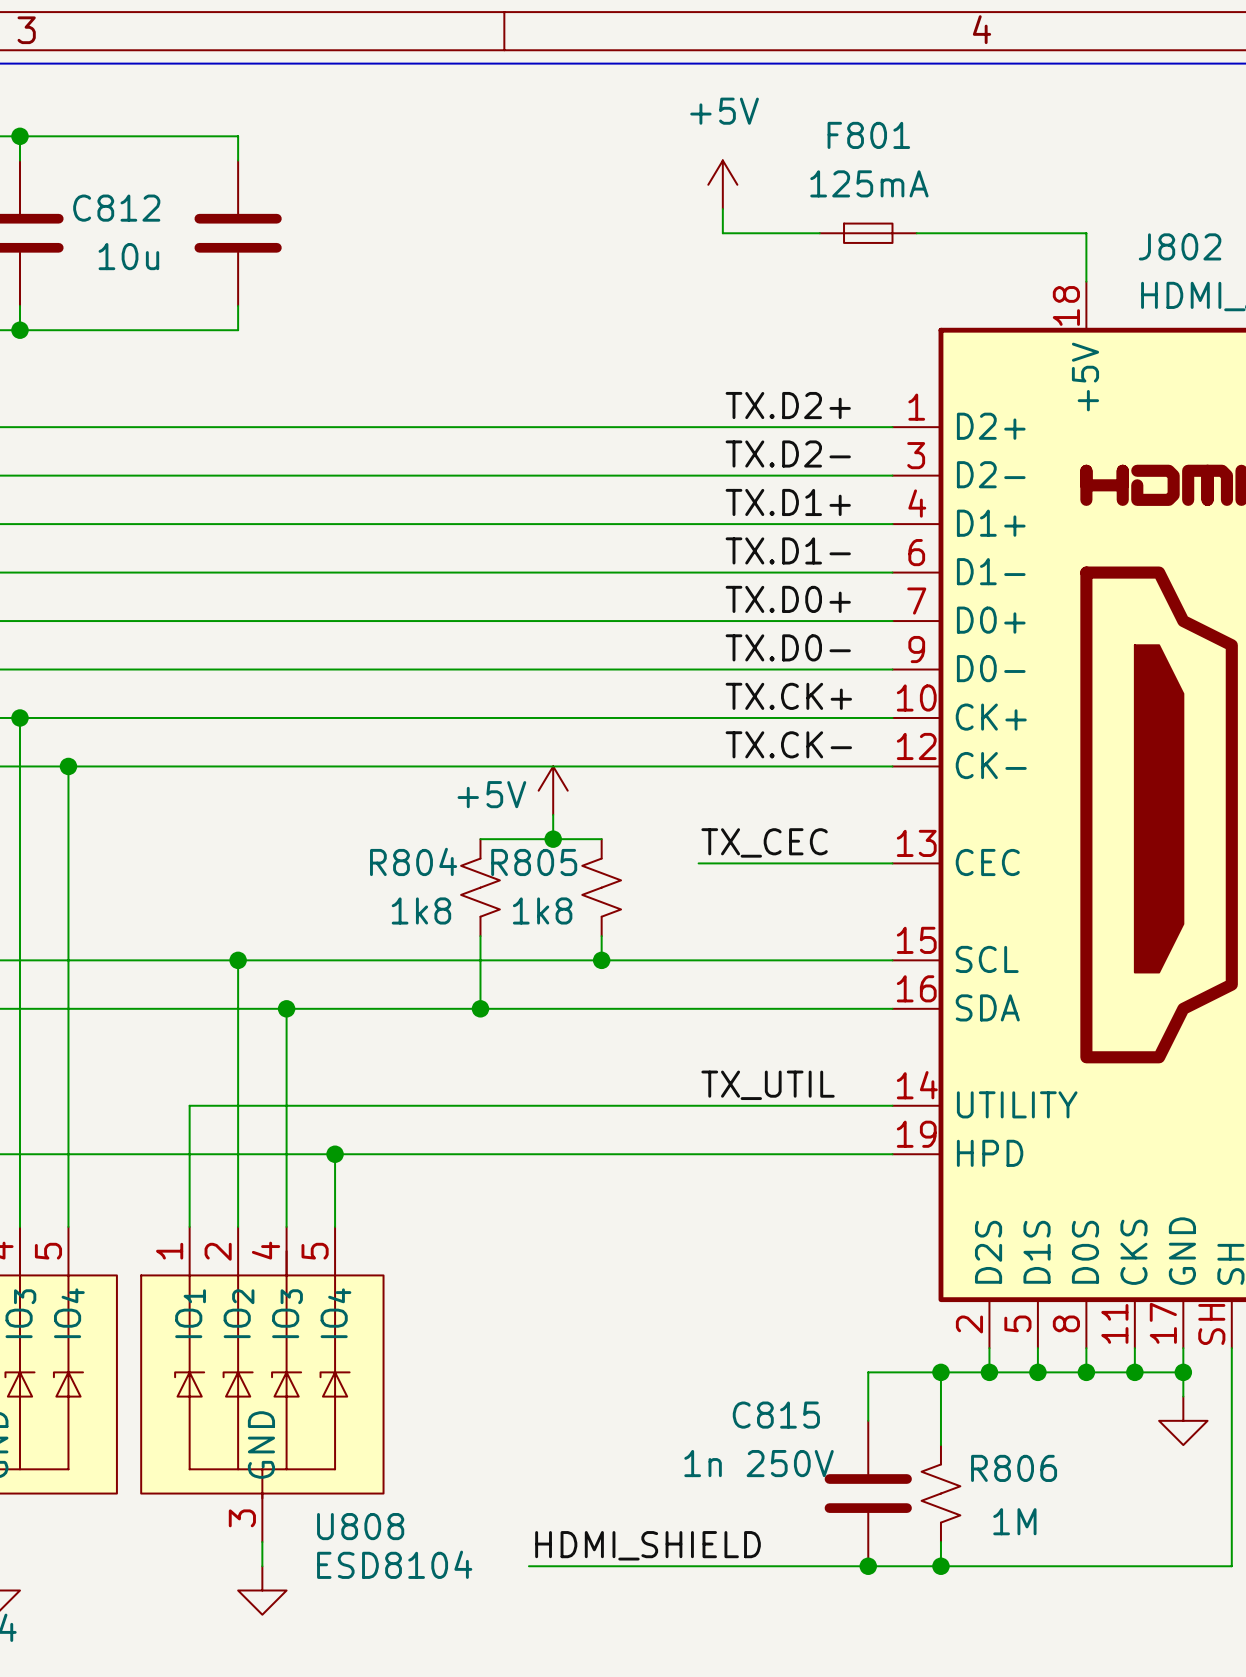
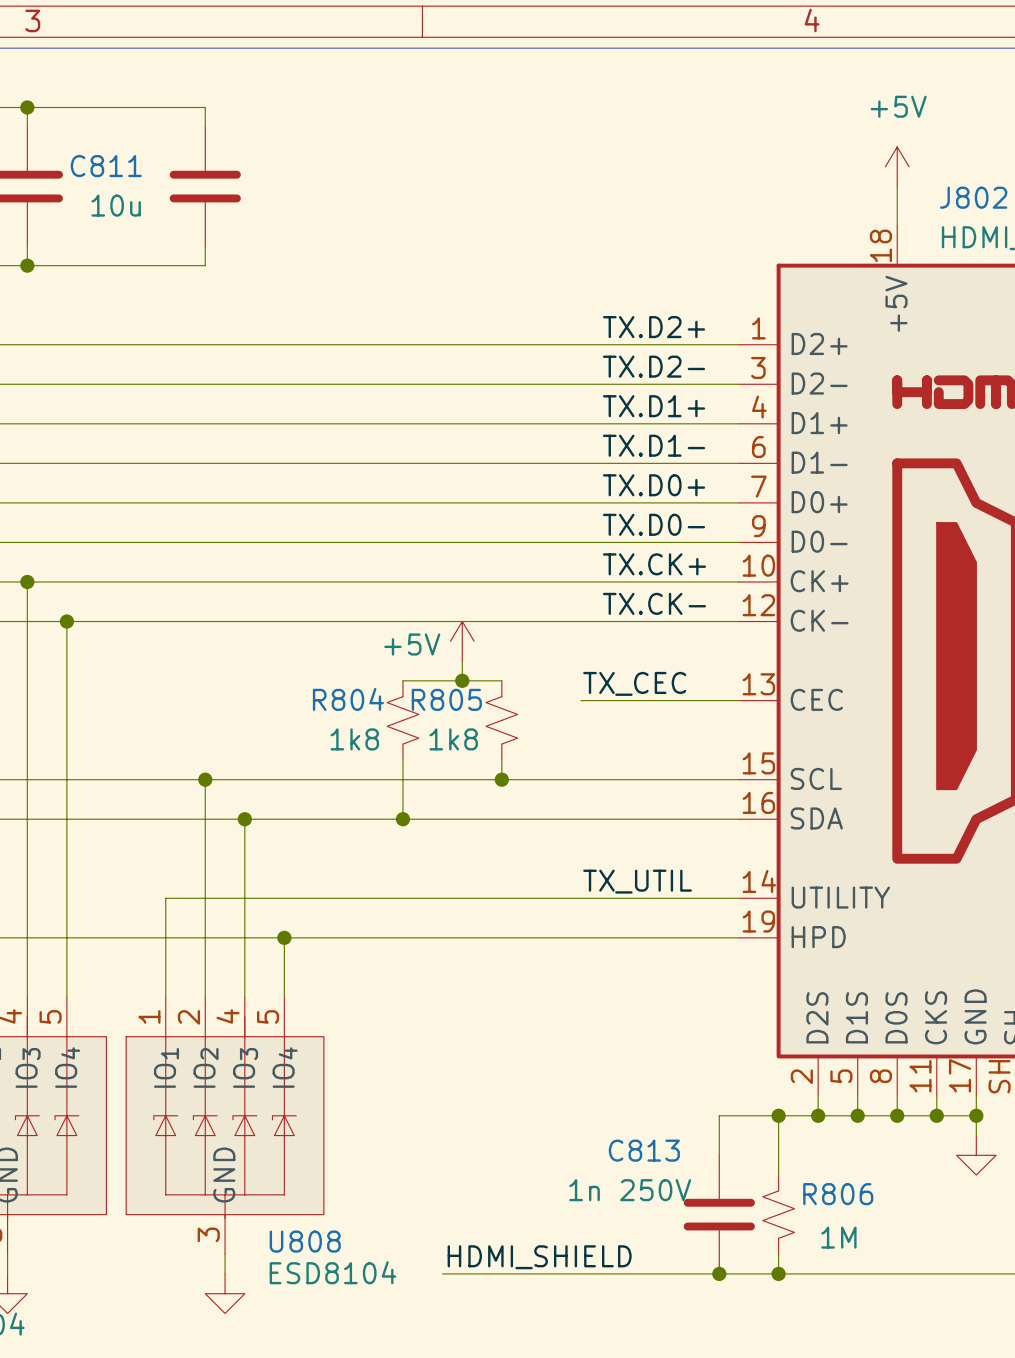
power symbol position: +5V (722, 184) -> +5V (897, 166)
C812 name: C812 (116, 208) -> C811 (106, 166)
wire: (722, 209) (722, 233) (819, 233) -> none
F801: 125mA (868, 233) -> none
wire: (916, 233) (1086, 233) -> none
C815 name: C815 (776, 1415) -> C813 (644, 1150)

